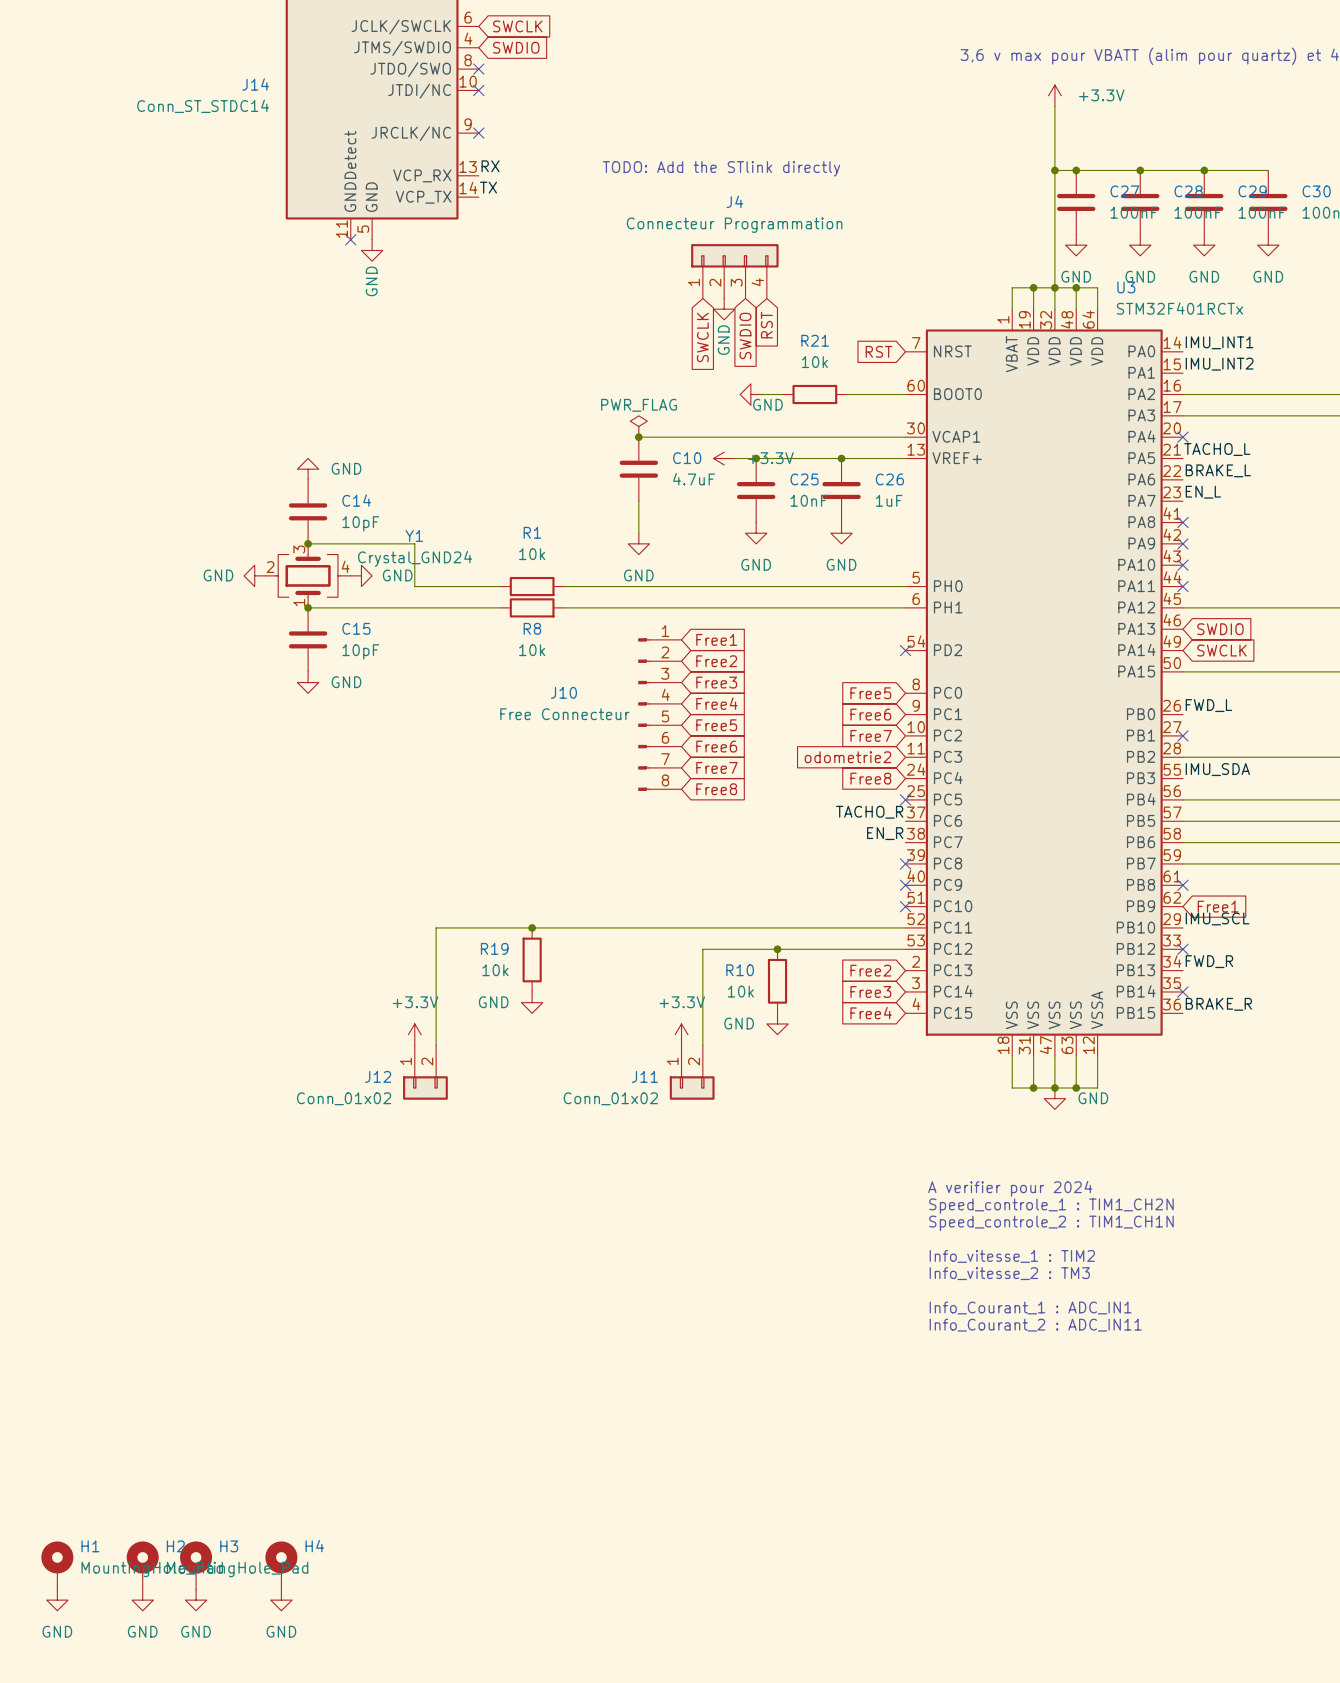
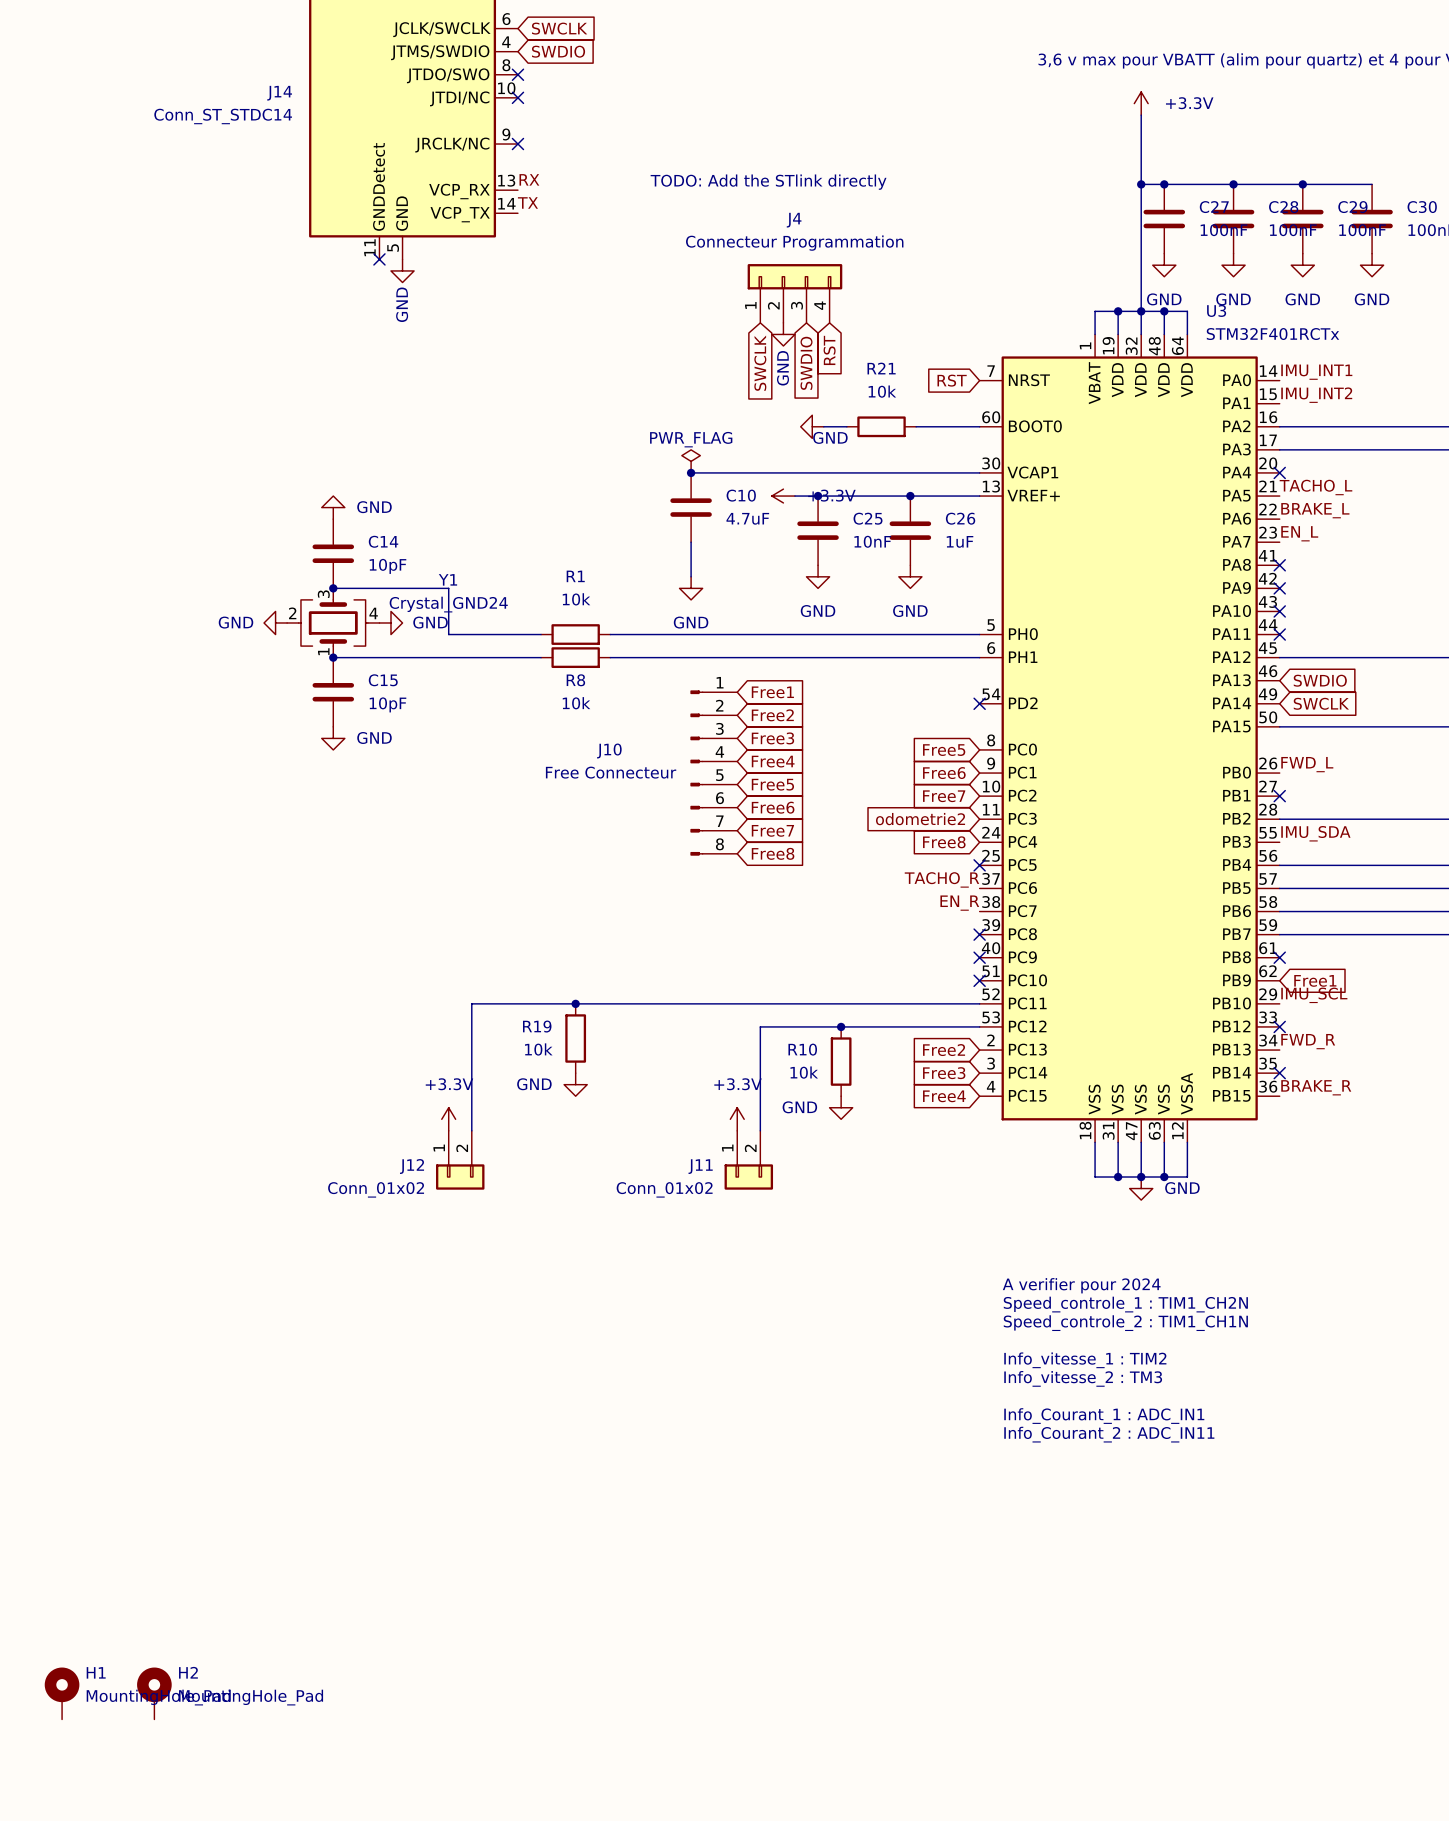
H3: (196, 1565) -> none
H4: (281, 1565) -> none
power symbol: GND (57, 1600) -> none
power symbol: GND (142, 1600) -> none
power symbol: GND (196, 1600) -> none
power symbol: GND (281, 1600) -> none

